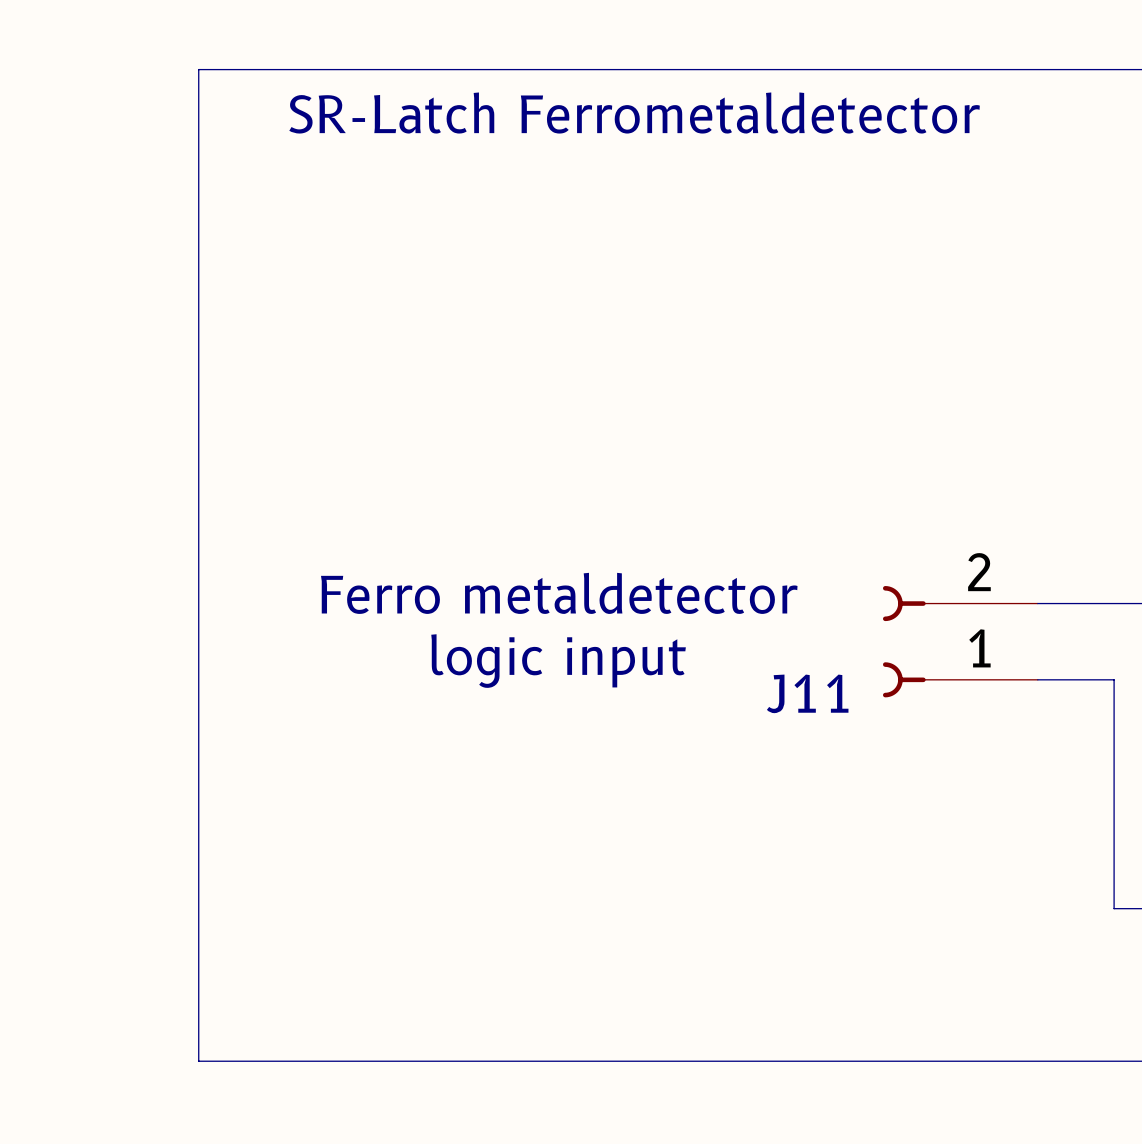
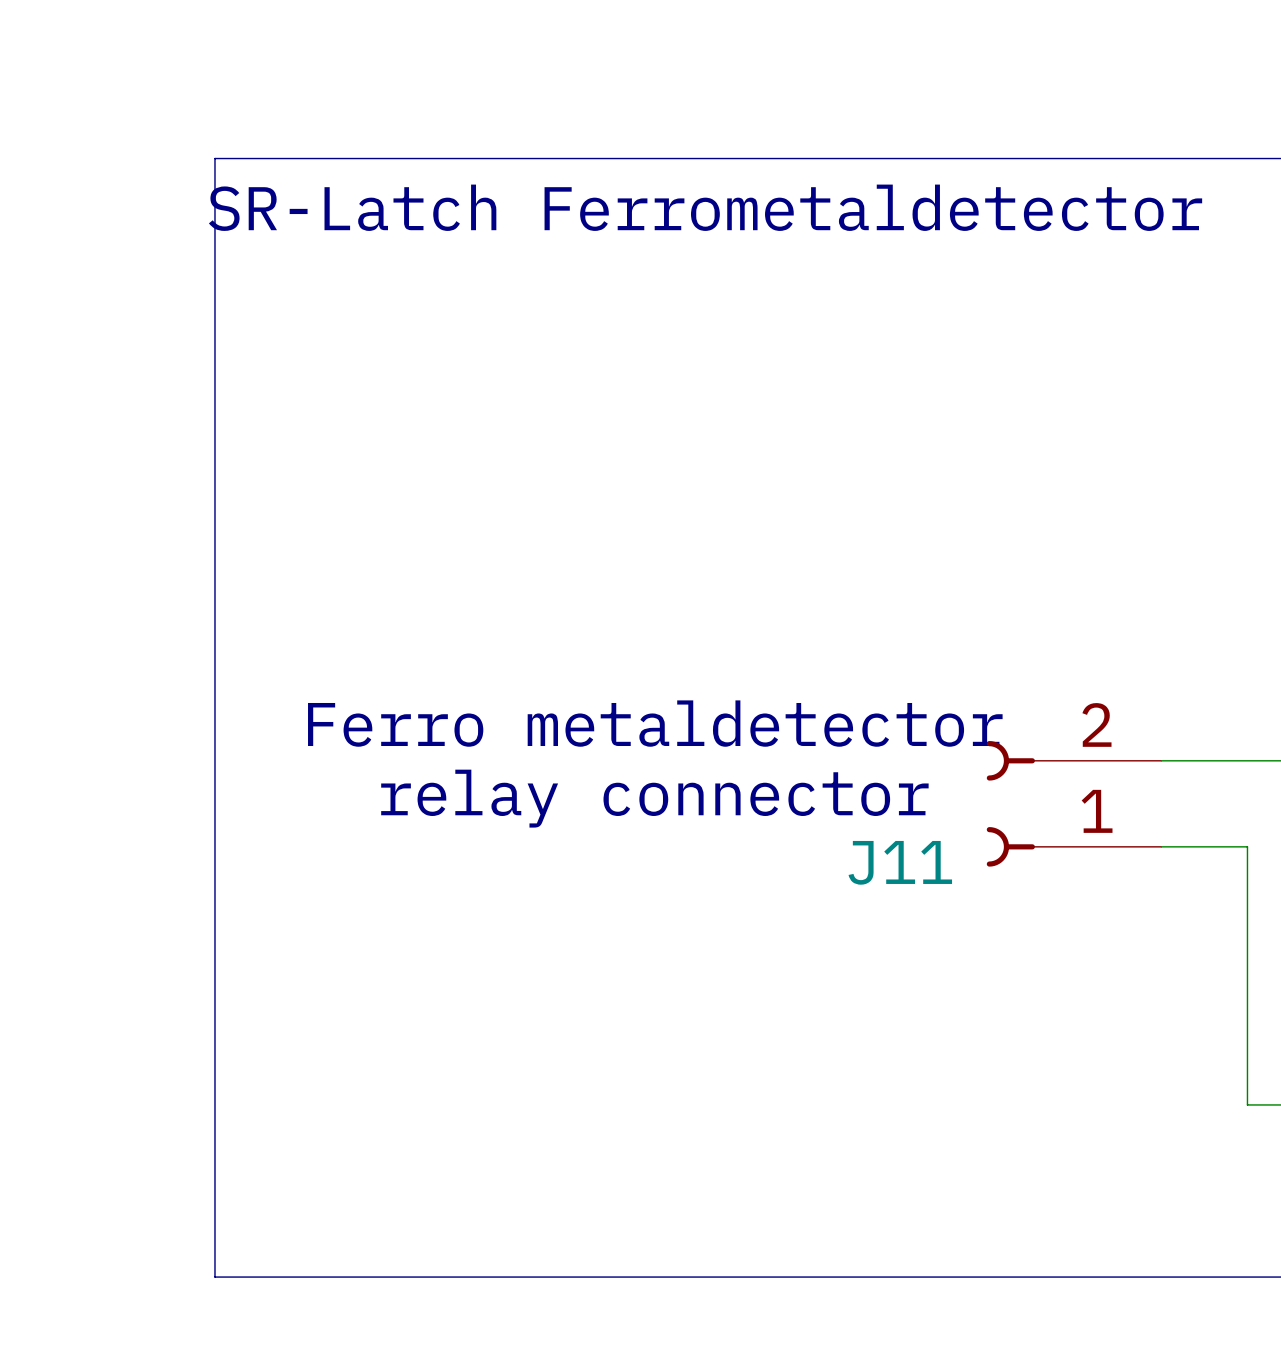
text position: Ferro metaldetector (559, 593) -> Ferro metaldetector (655, 723)
text: none -> relay connector (654, 798)
text: logic input (558, 661) -> none

